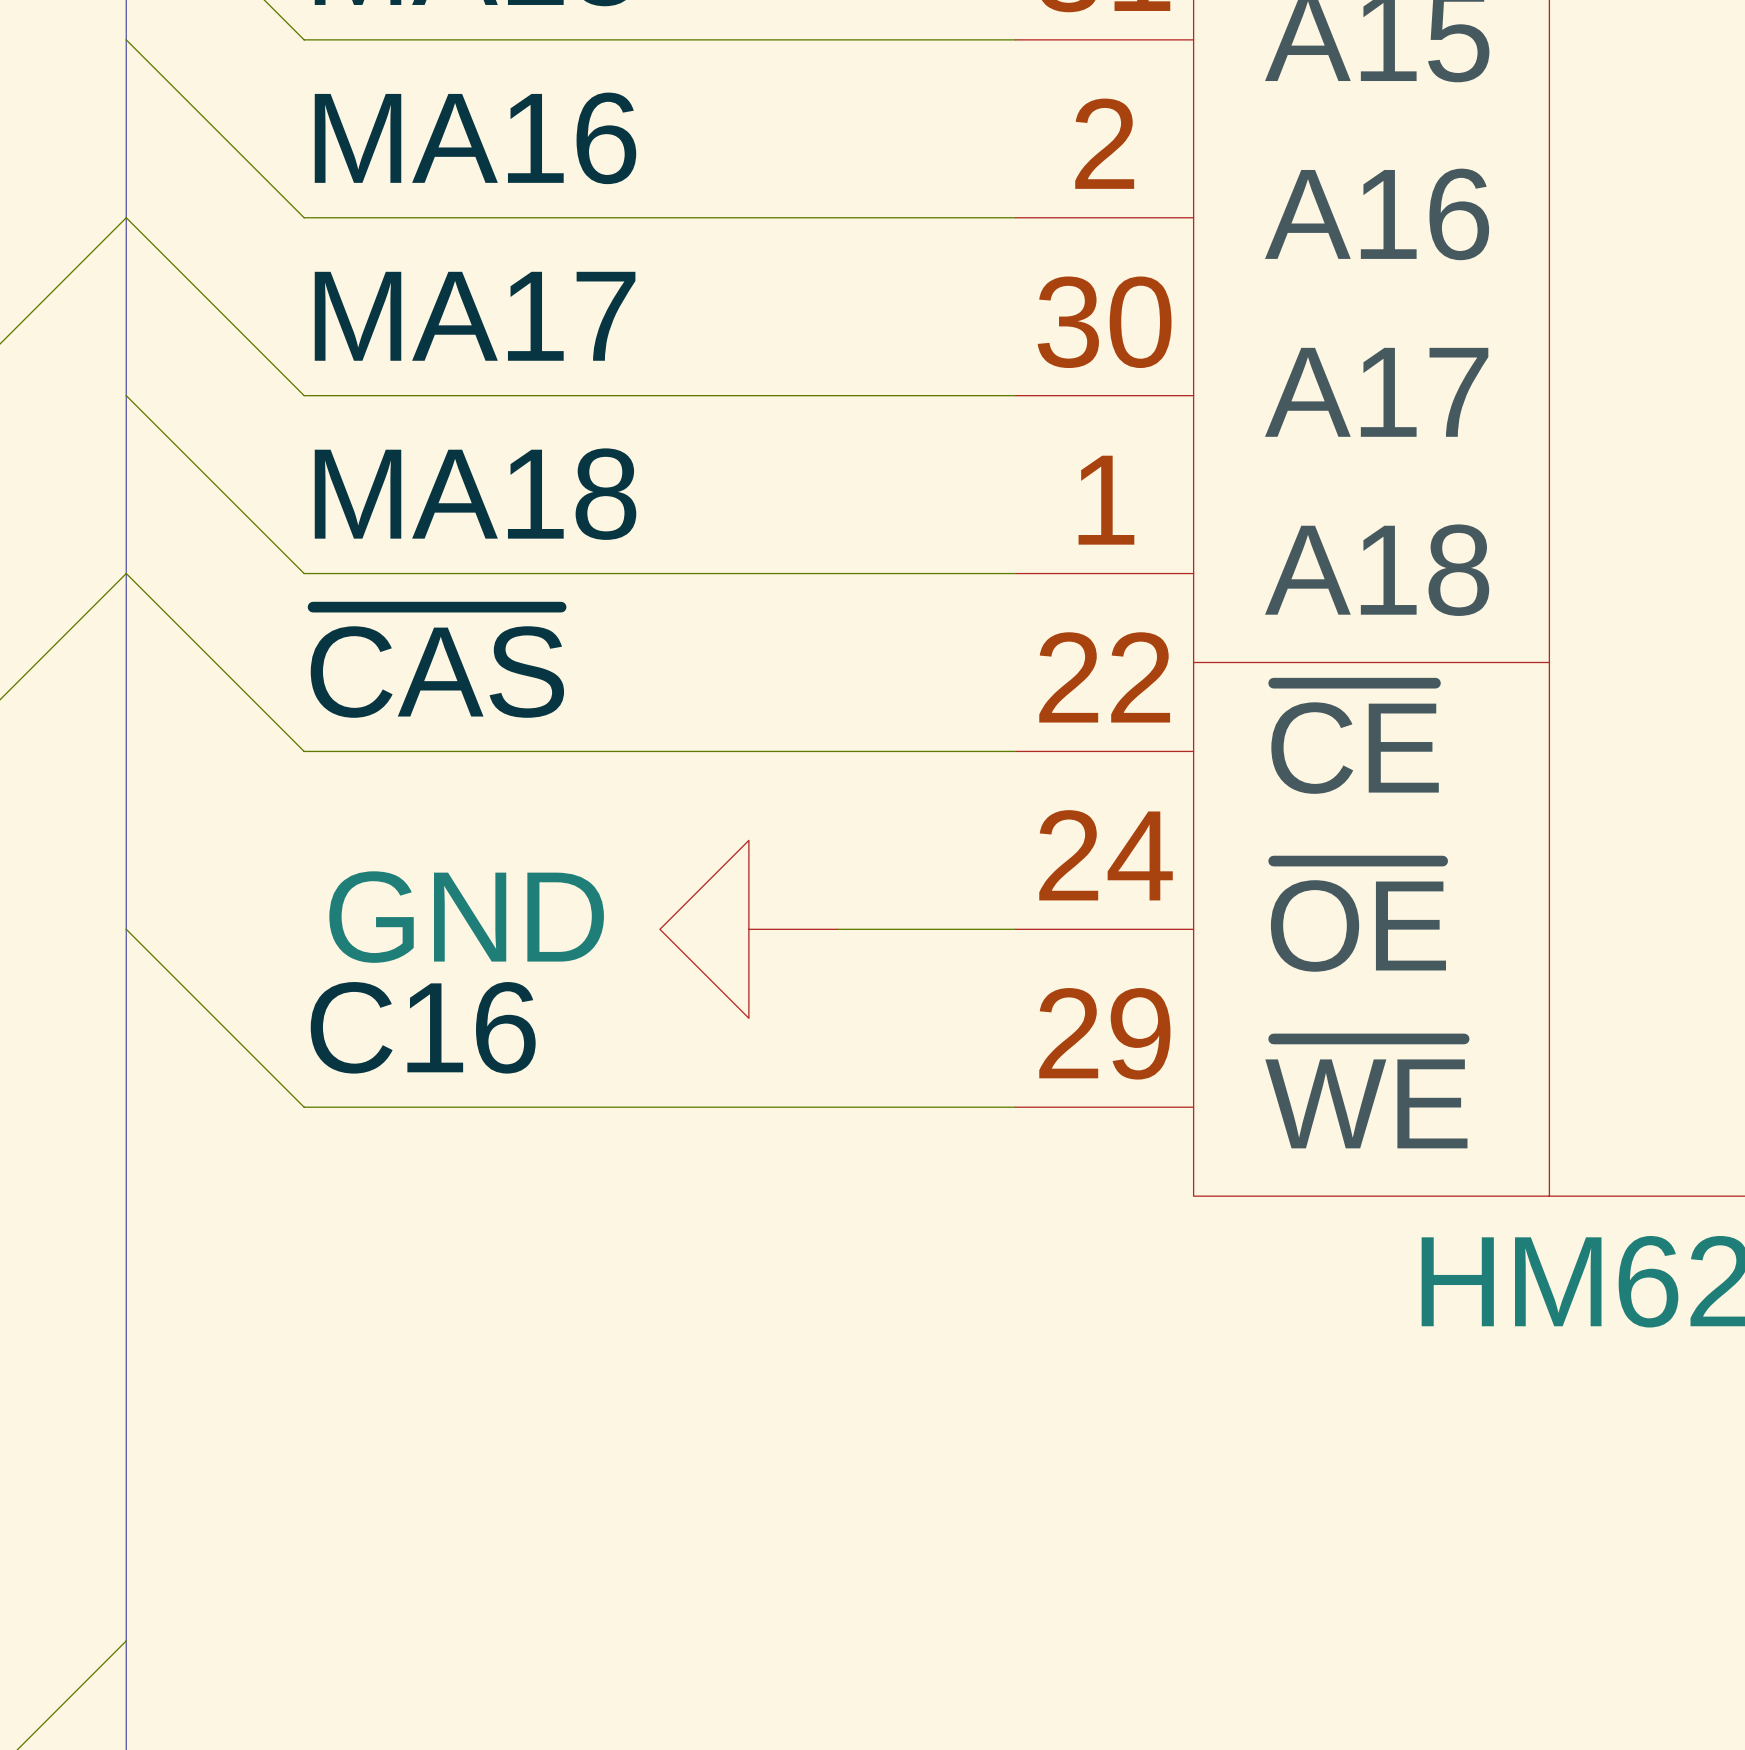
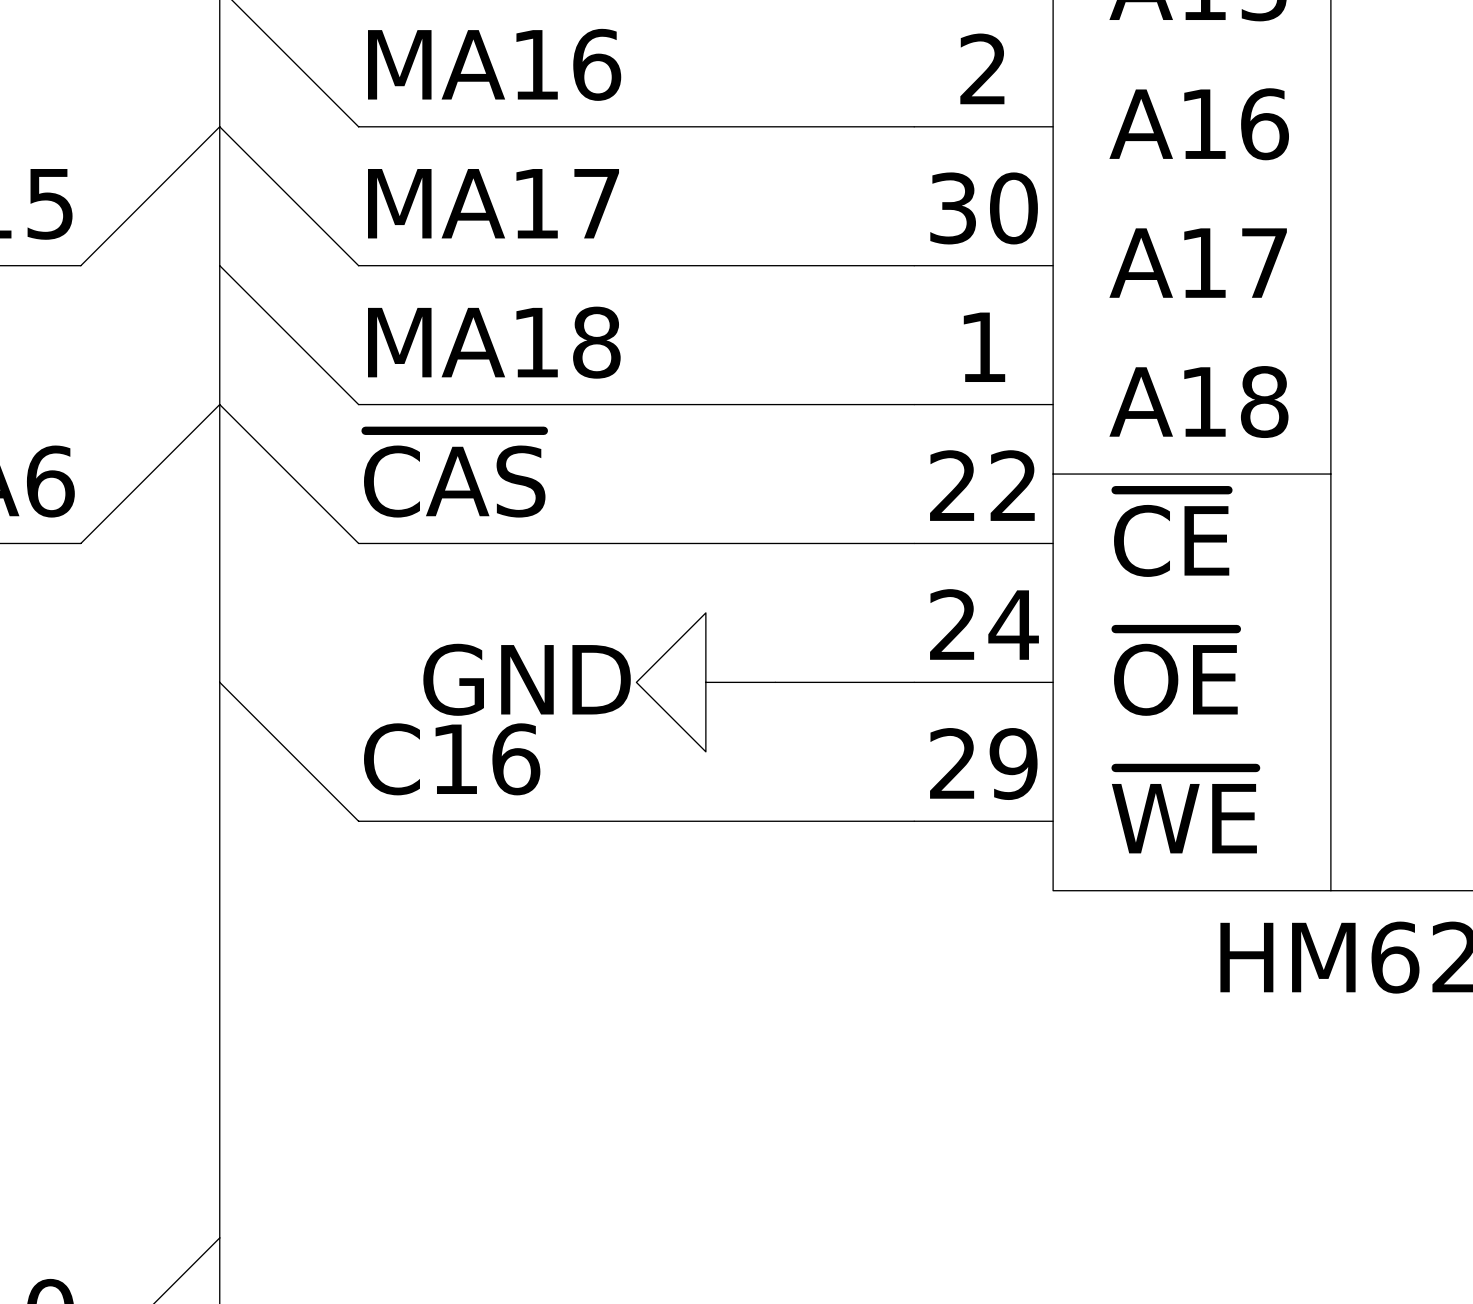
power symbol text position: GND (466, 917) -> GND (527, 679)

